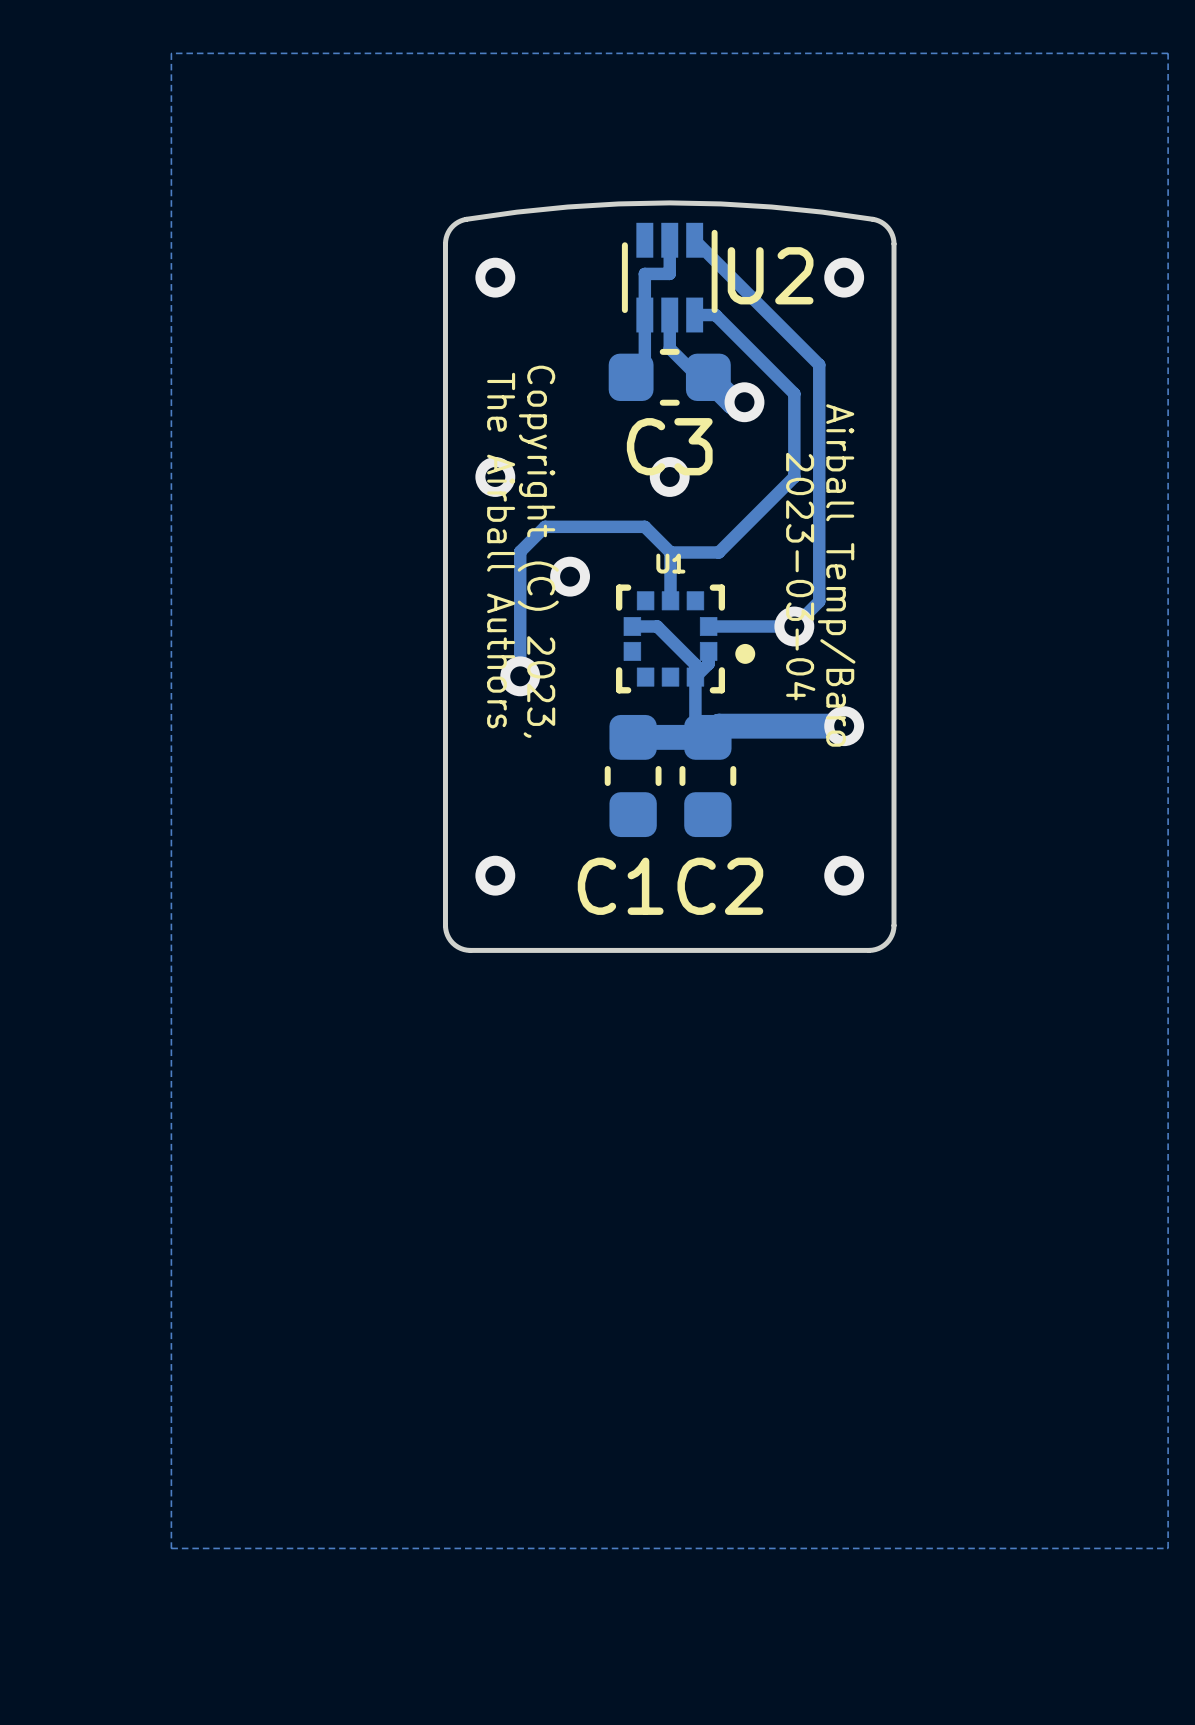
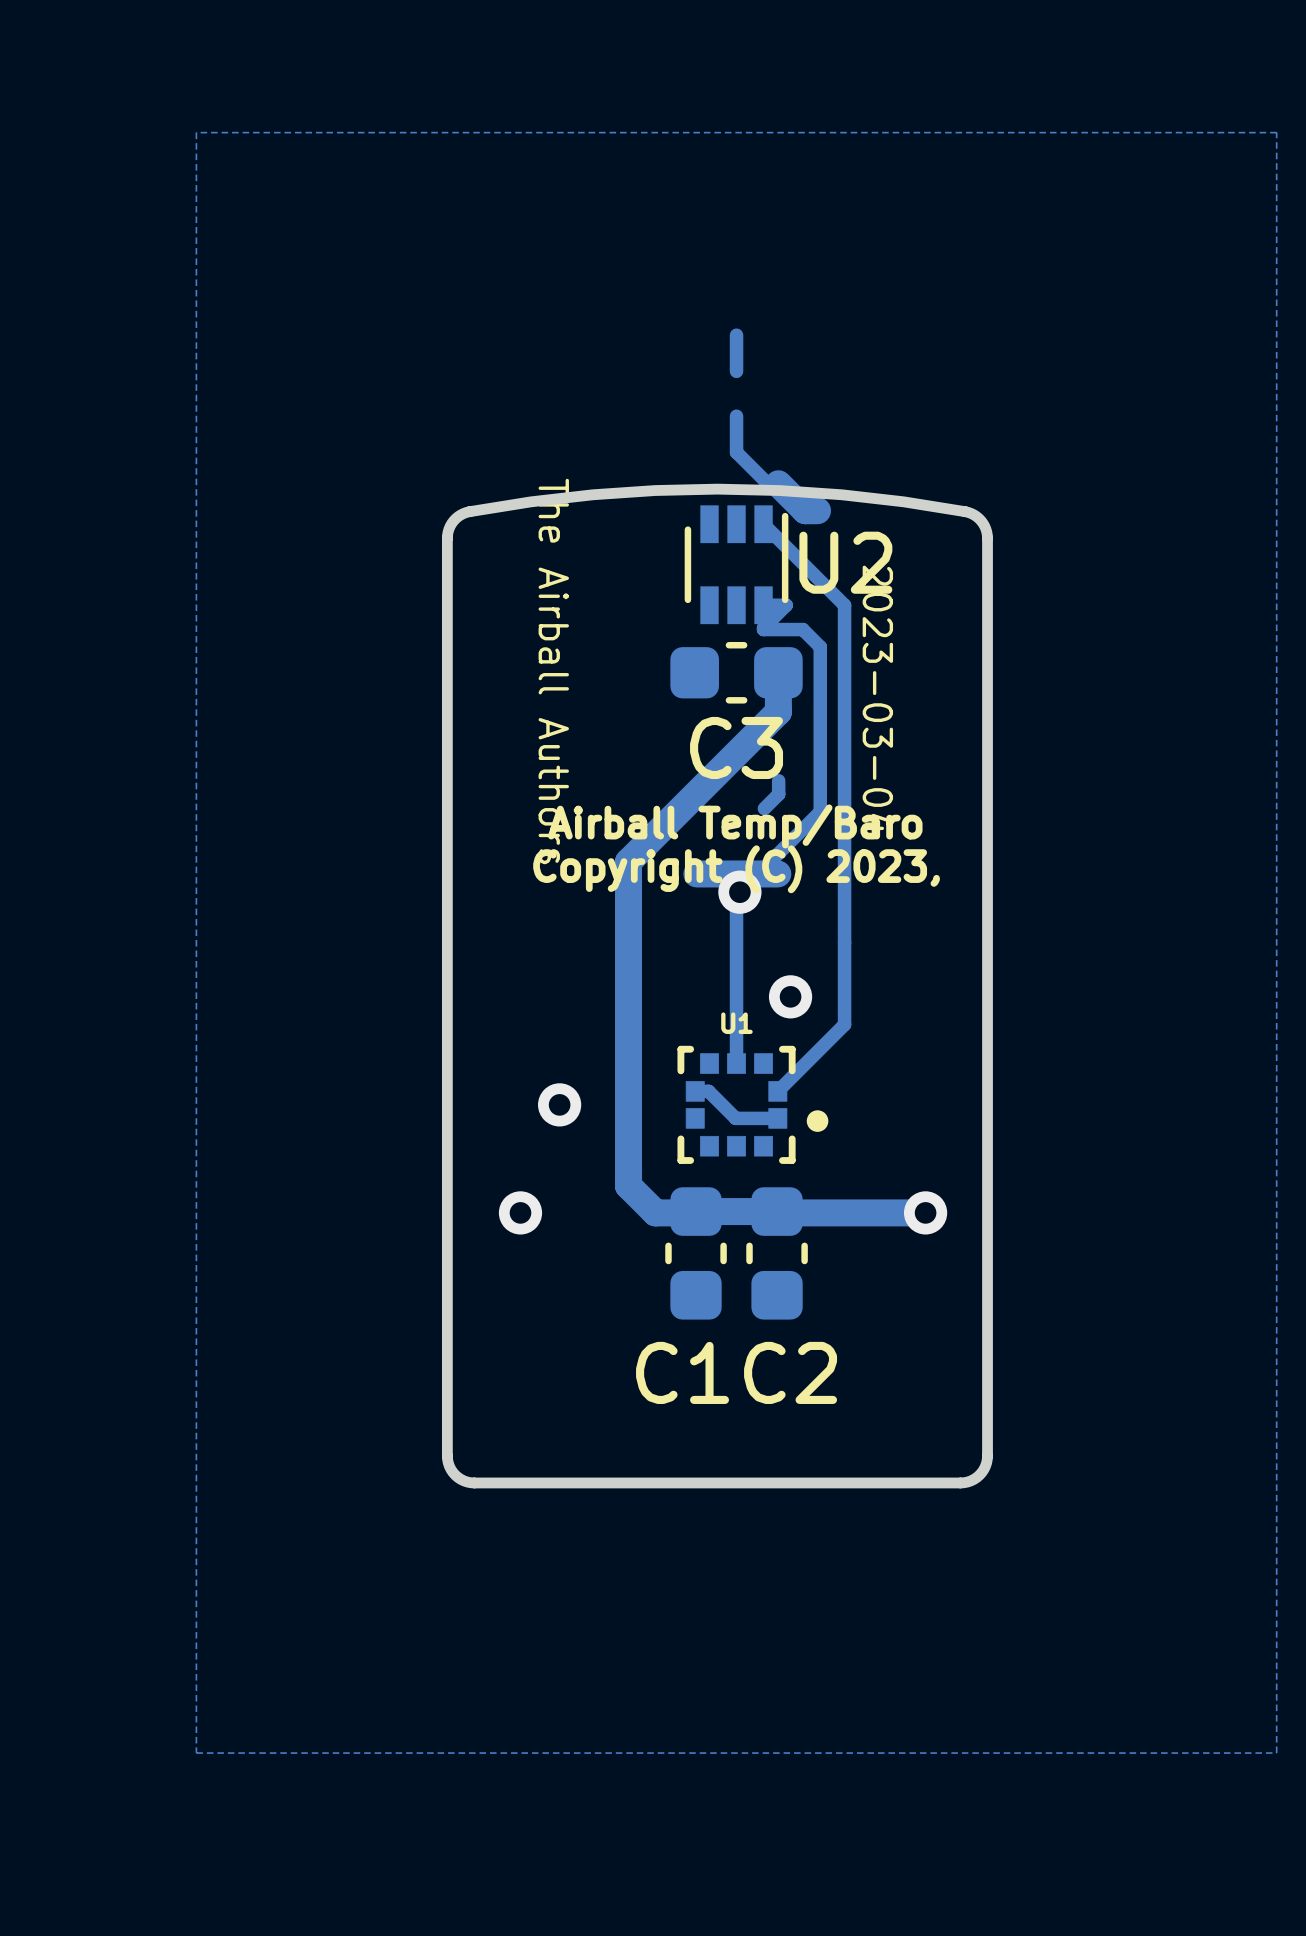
board edge: (873, 219) (771, 207) (669, 202) (618, 203) (567, 207) (466, 219) (455, 223) (448, 232) (445, 243) (445, 925) (448, 937) (457, 947) (470, 950) (869, 950) (881, 947) (890, 937) (894, 925) (894, 243) (892, 235) (888, 227) (881, 222) (873, 219) -> none
track: (694, 240) (819, 364) (819, 601) (794, 626) (708, 626) -> none
track: (669, 273) (644, 273) (644, 363) (631, 377) -> none
via: (495, 277) -> none
U2 position: (669, 277) -> (736, 564)
via: (844, 277) -> none
track: (694, 315) (715, 315) (794, 393) (794, 476) (718, 552) (670, 552) -> none
C3 position: (669, 377) -> (736, 672)
via: (744, 402) -> none
board edge: none -> (965, 511) (841, 494) (779, 490) (655, 490) (531, 501) (469, 511) (458, 516) (450, 526) (447, 538) (447, 1455) (450, 1469) (460, 1479) (474, 1482) (960, 1482) (974, 1479) (983, 1469) (987, 1455) (987, 538) (985, 529) (981, 520) (974, 514) (965, 511)
track: none -> (763, 524) (844, 605) (844, 1024) (777, 1091)
via: (495, 476) -> none
via: (669, 476) -> none
track: none -> (763, 605) (786, 605) (763, 629) (802, 629) (820, 646) (820, 811) (736, 895) (736, 1063)
text rotation: 0° (538, 551) -> 90° counterclockwise (736, 869)
track: none -> (778, 672) (778, 711) (628, 861) (628, 1185) (655, 1212) (925, 1212)
track: (670, 552) (670, 600) -> none
track: (670, 552) (644, 526) (545, 526) (520, 551) (520, 676) -> none
text rotation: 0° (836, 575) -> 90° counterclockwise (735, 826)
via: (570, 576) -> none
track: (632, 626) (657, 626) (695, 664) (695, 724) (707, 737) (719, 726) (844, 726) -> none
via: (794, 626) -> none
U1 position: (685, 638) -> (752, 1104)
via: (520, 676) -> none
via: (844, 726) -> none
via: none -> (739, 892)
C1 position: (633, 776) -> (696, 1253)
C2 position: (707, 776) -> (777, 1253)
via: none -> (790, 996)
via position: (495, 875) -> (559, 1104)
via: (844, 875) -> none
track: none -> (695, 1091) (708, 1091) (735, 1118) (777, 1118)
via: none -> (520, 1212)
via: none -> (925, 1212)

